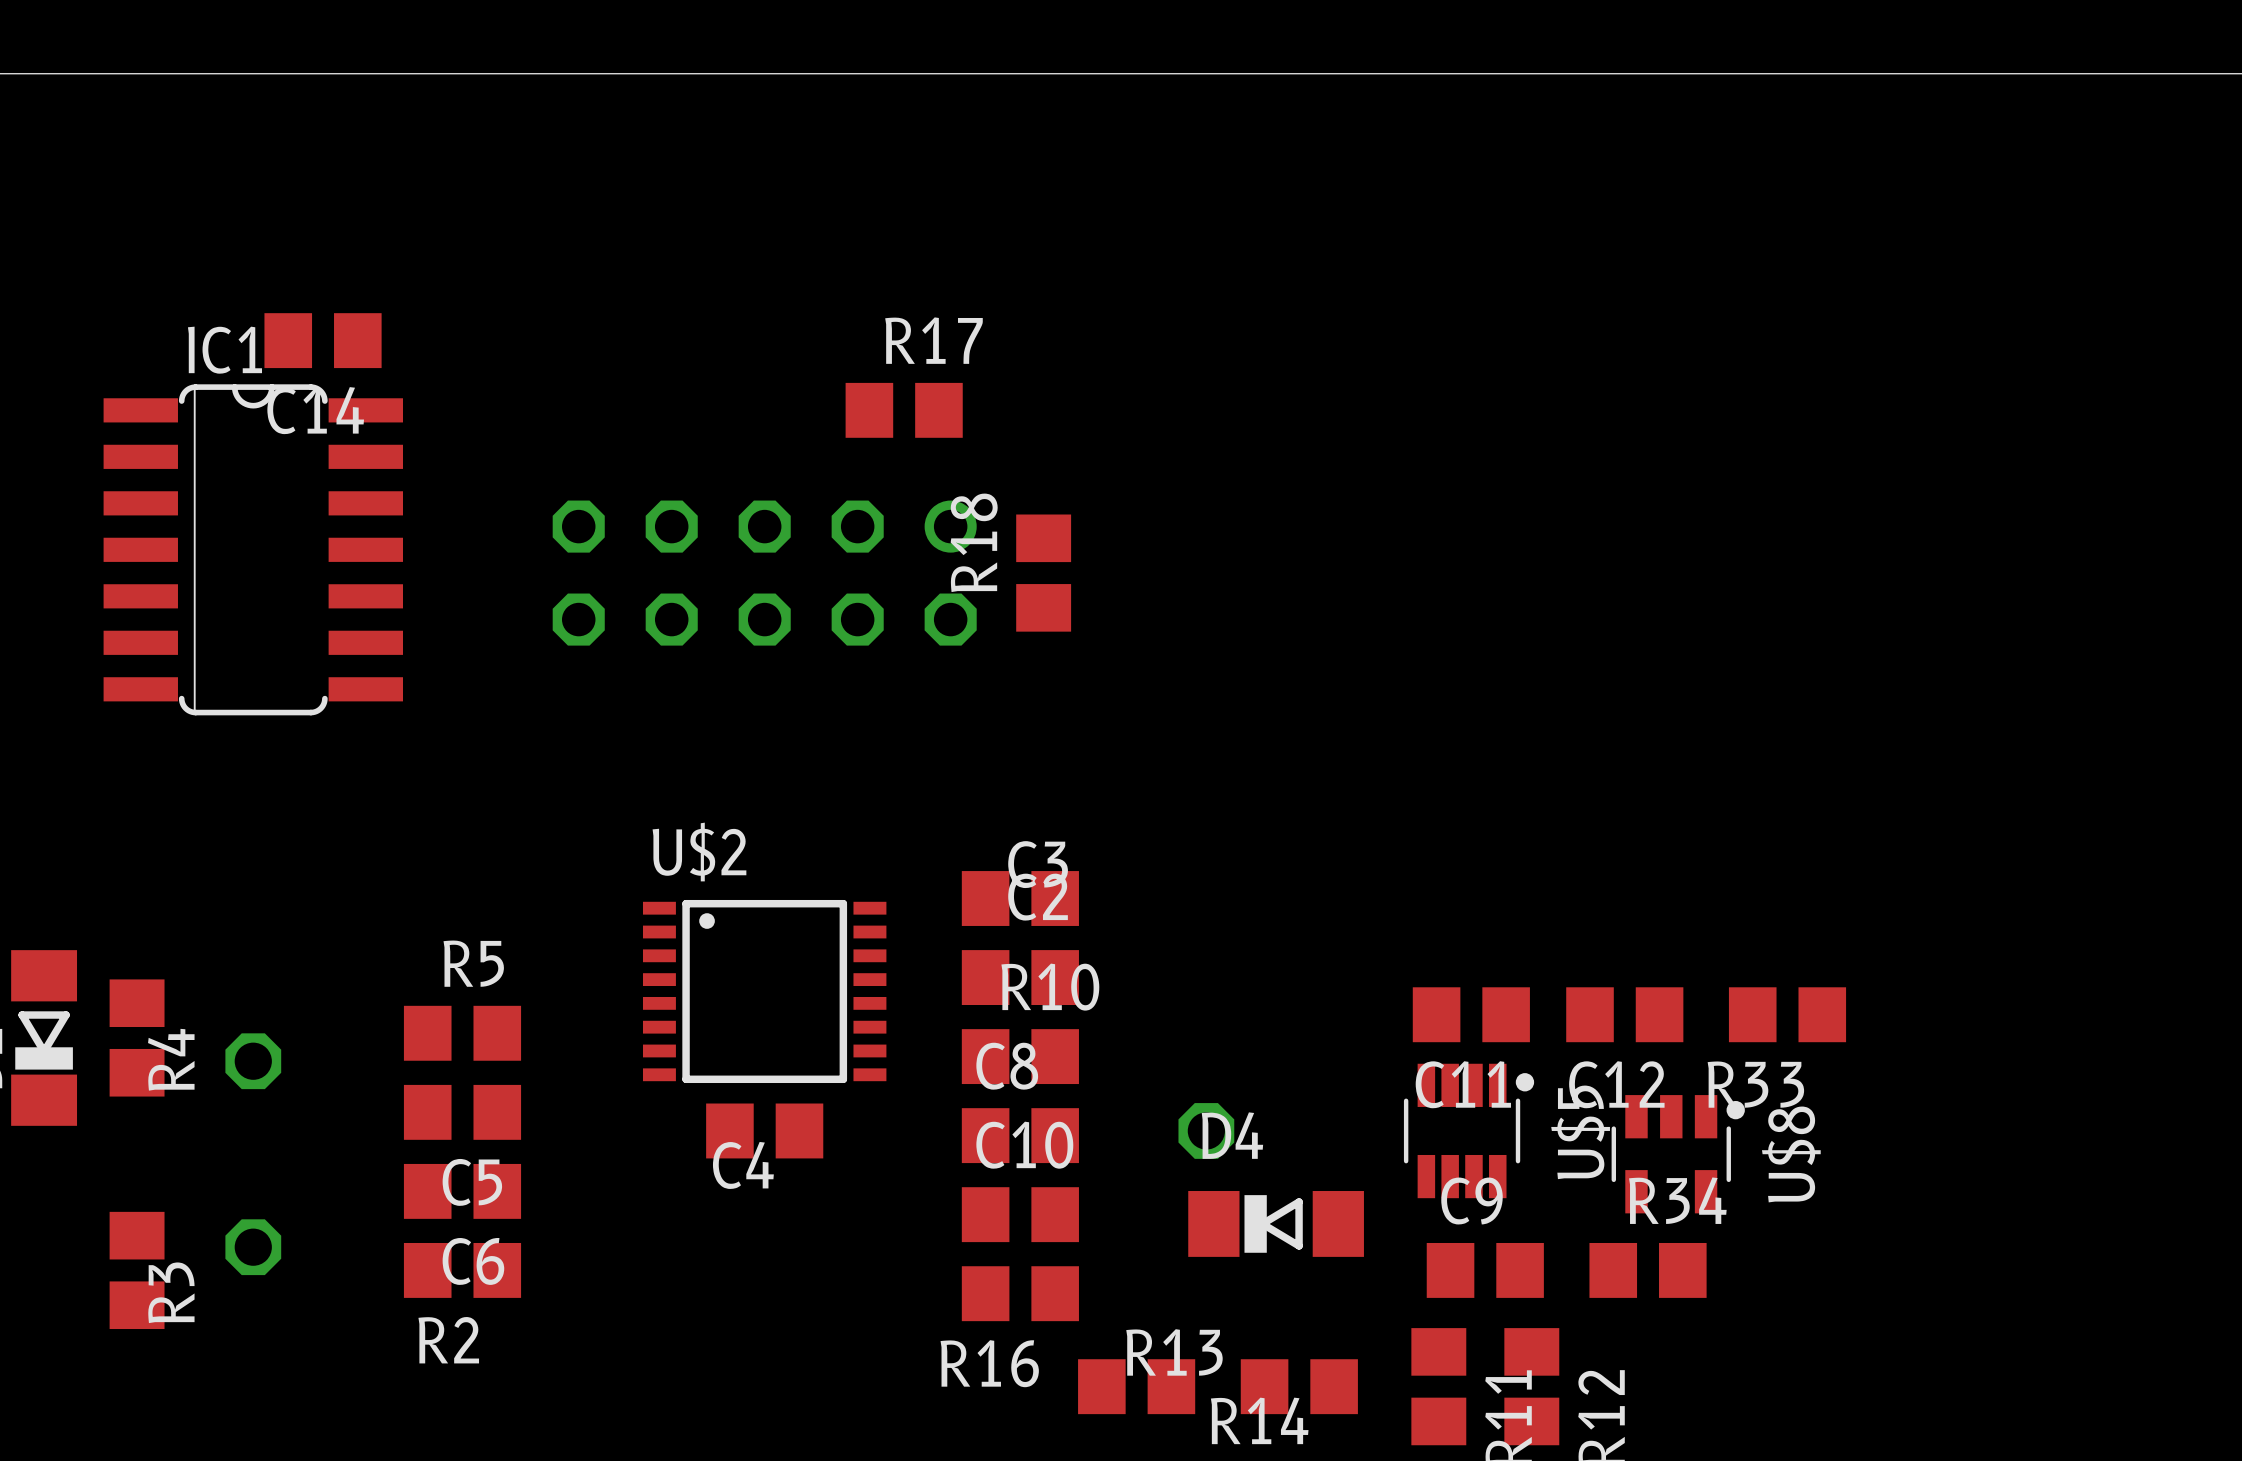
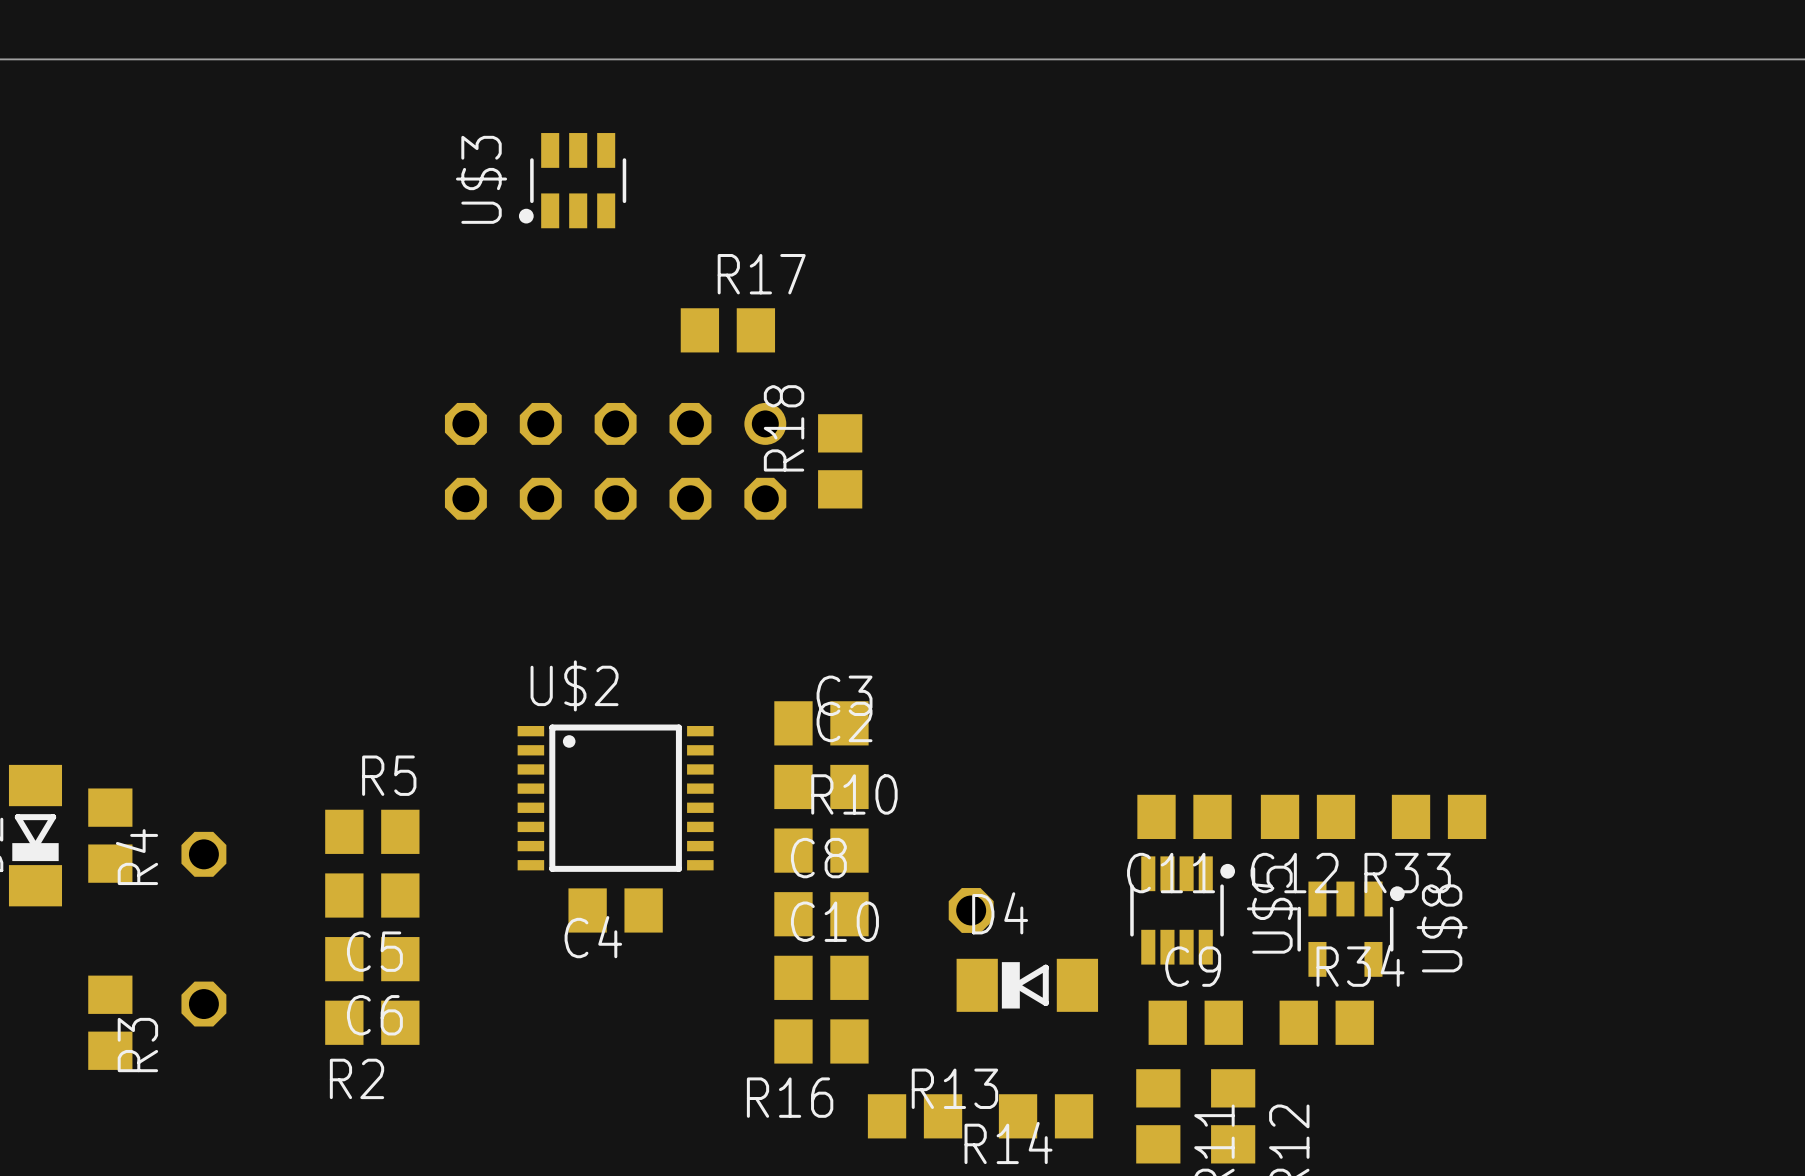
U$3: none -> (572, 180)
C14: (323, 340) -> none
IC1: (253, 549) -> none

